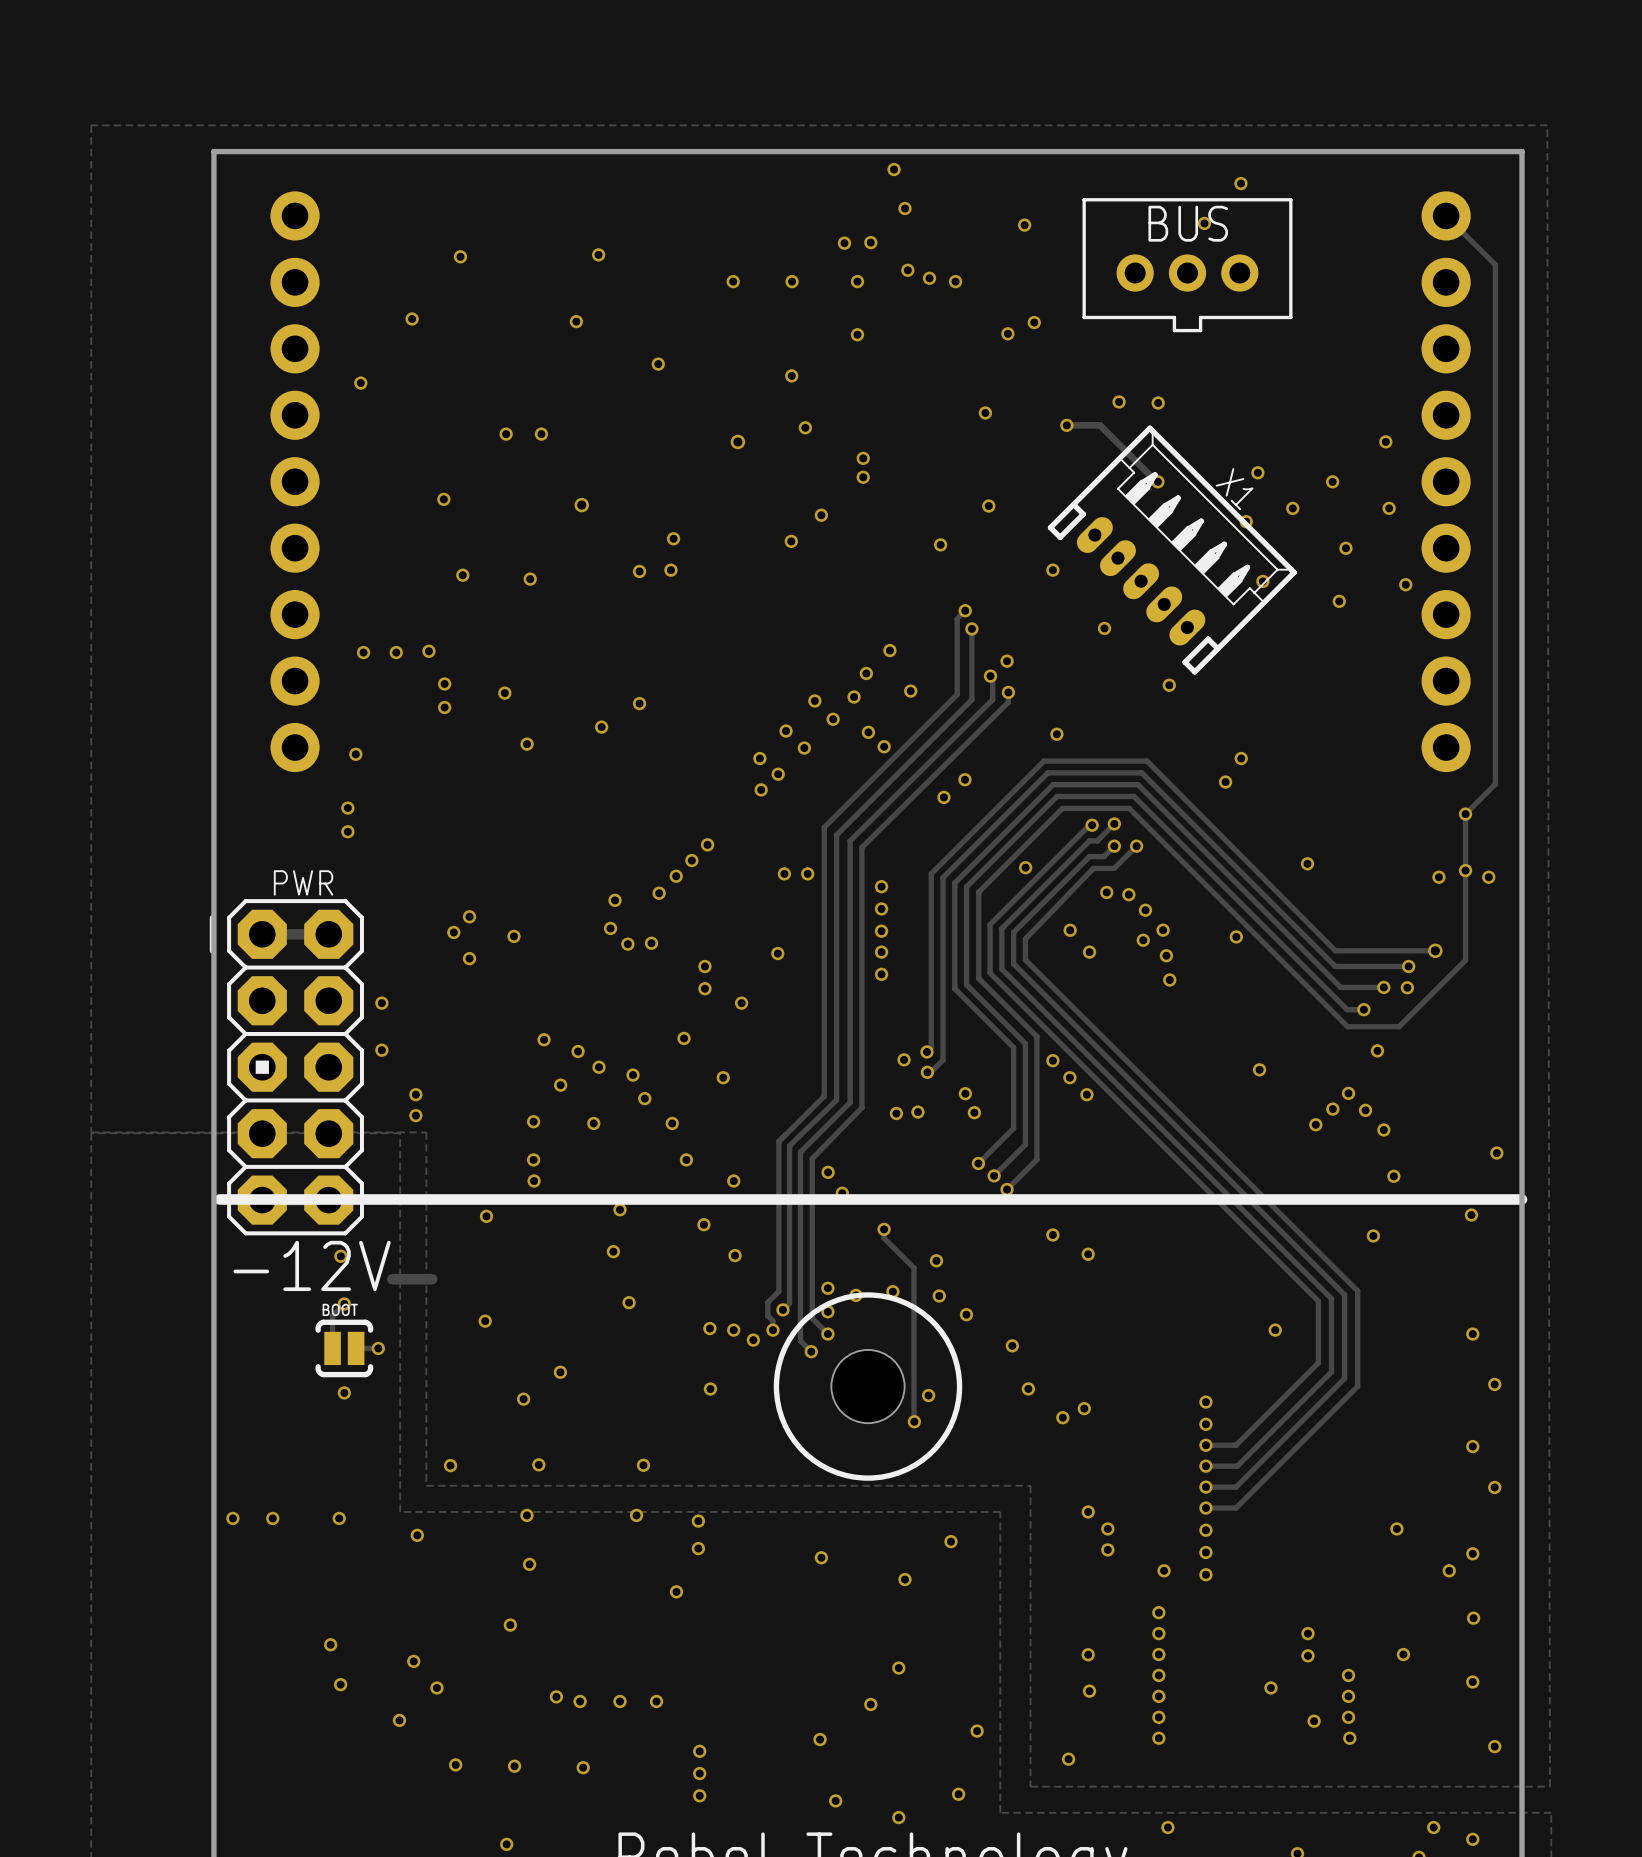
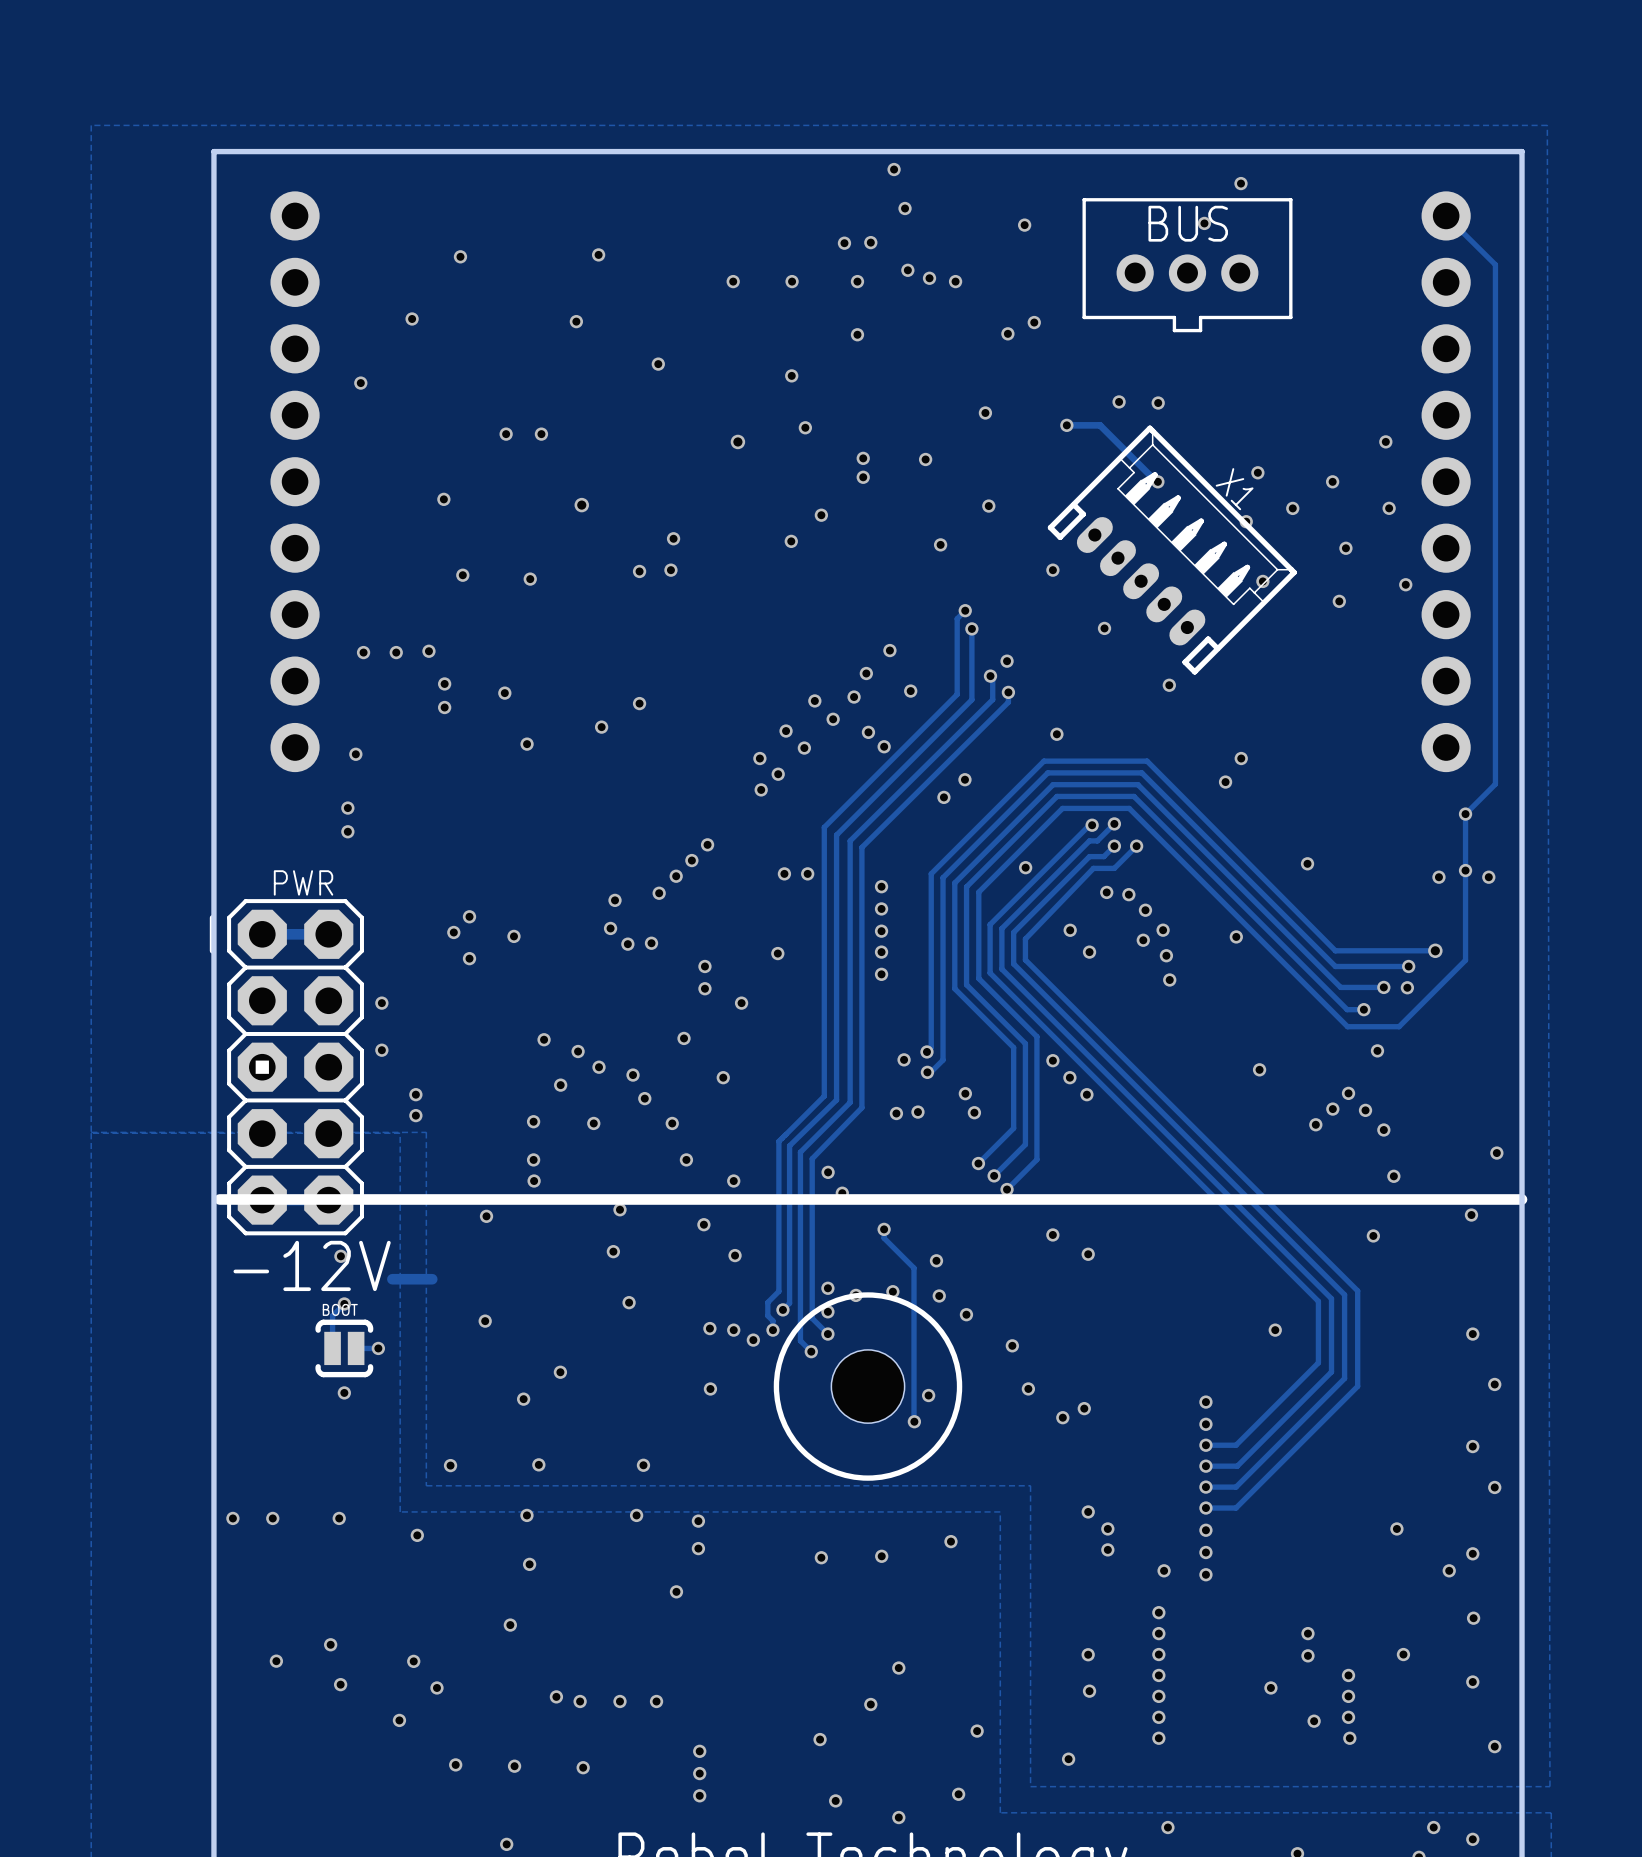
via: none -> (925, 459)
via position: (904, 1579) -> (881, 1556)
via: none -> (276, 1661)

